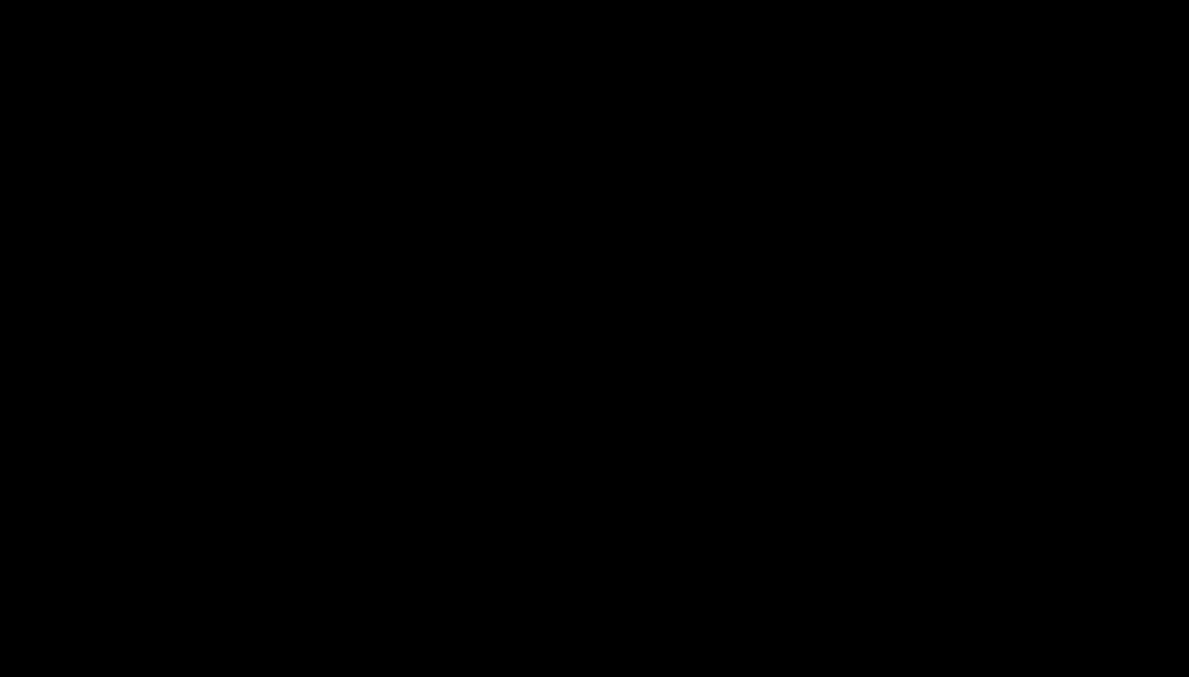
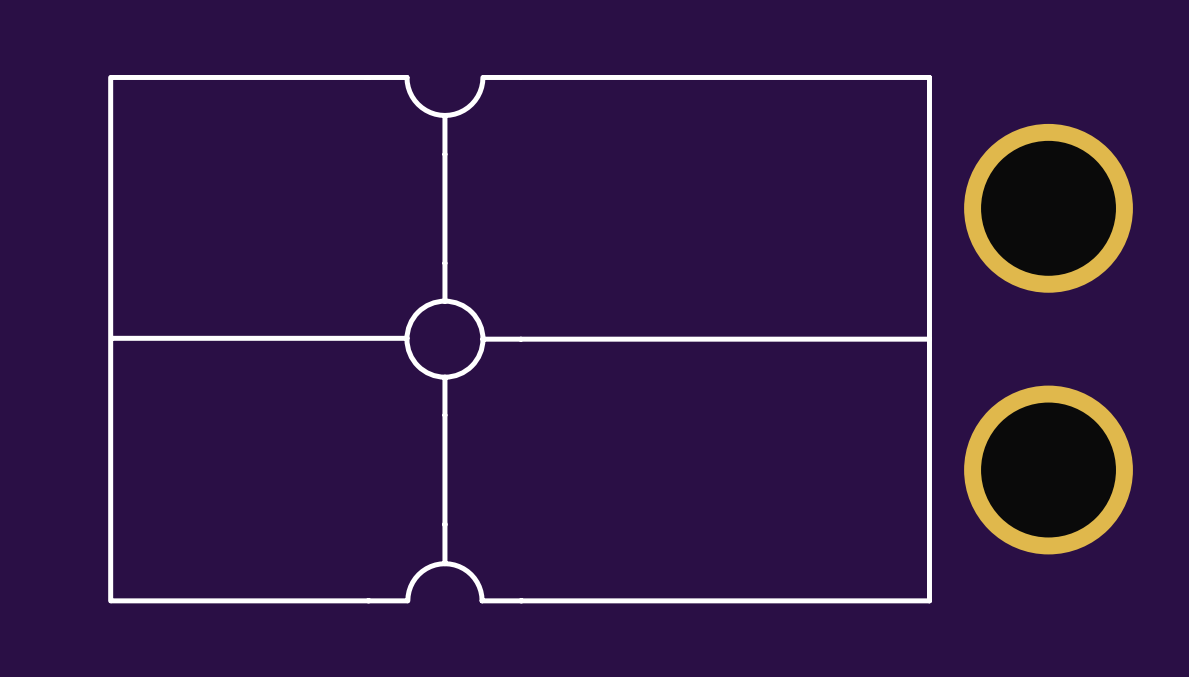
part: none -> (620, 339)

